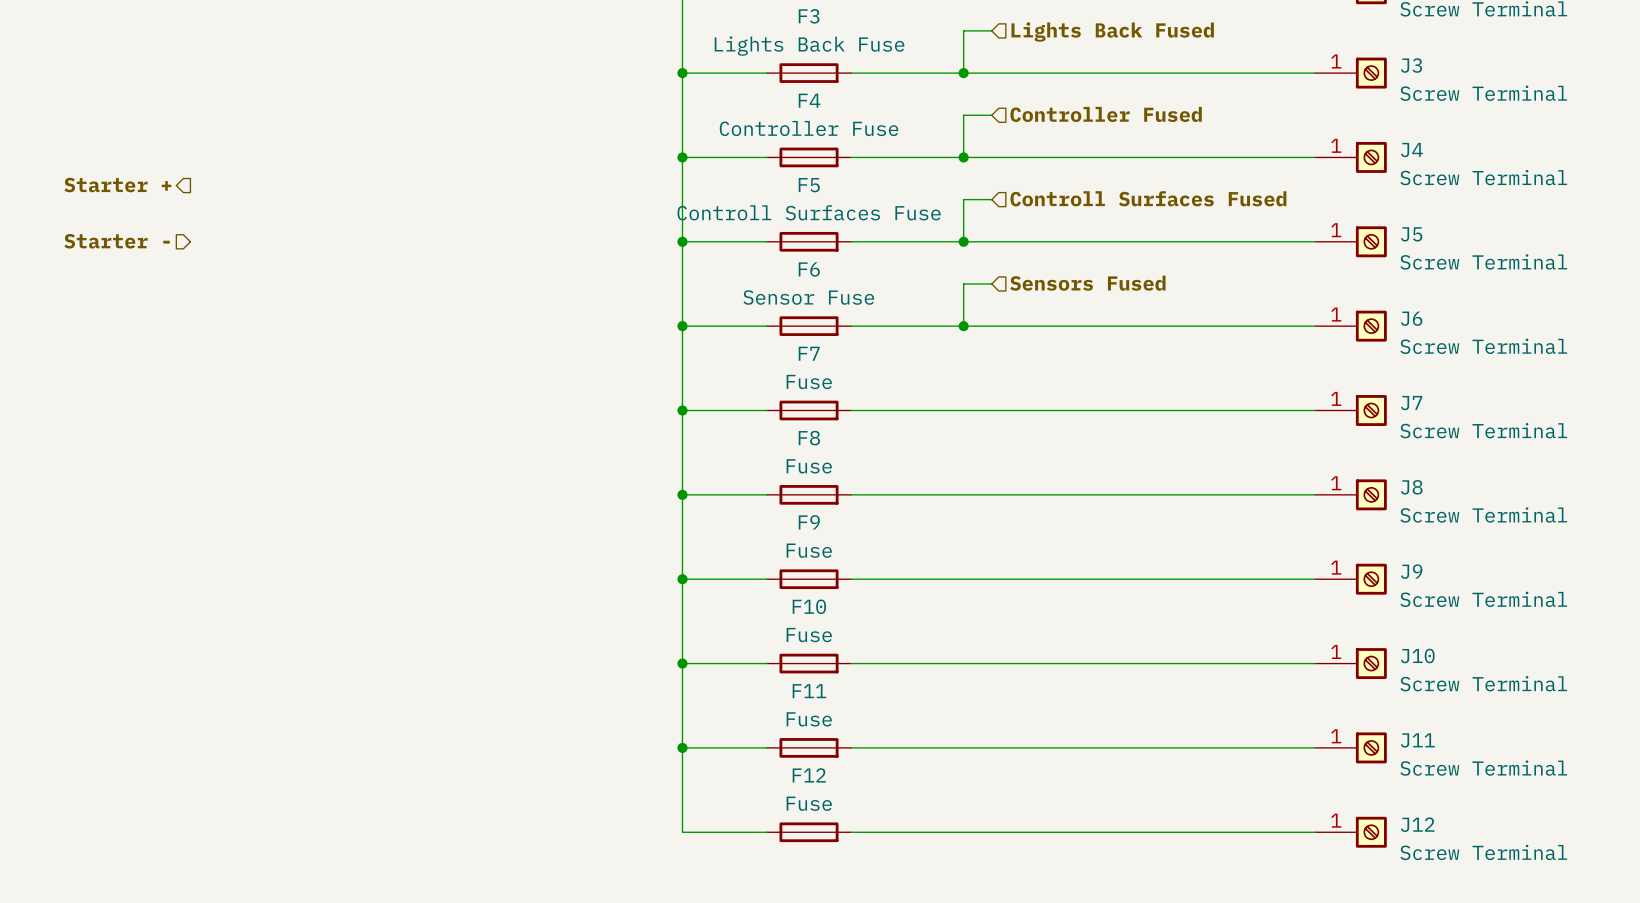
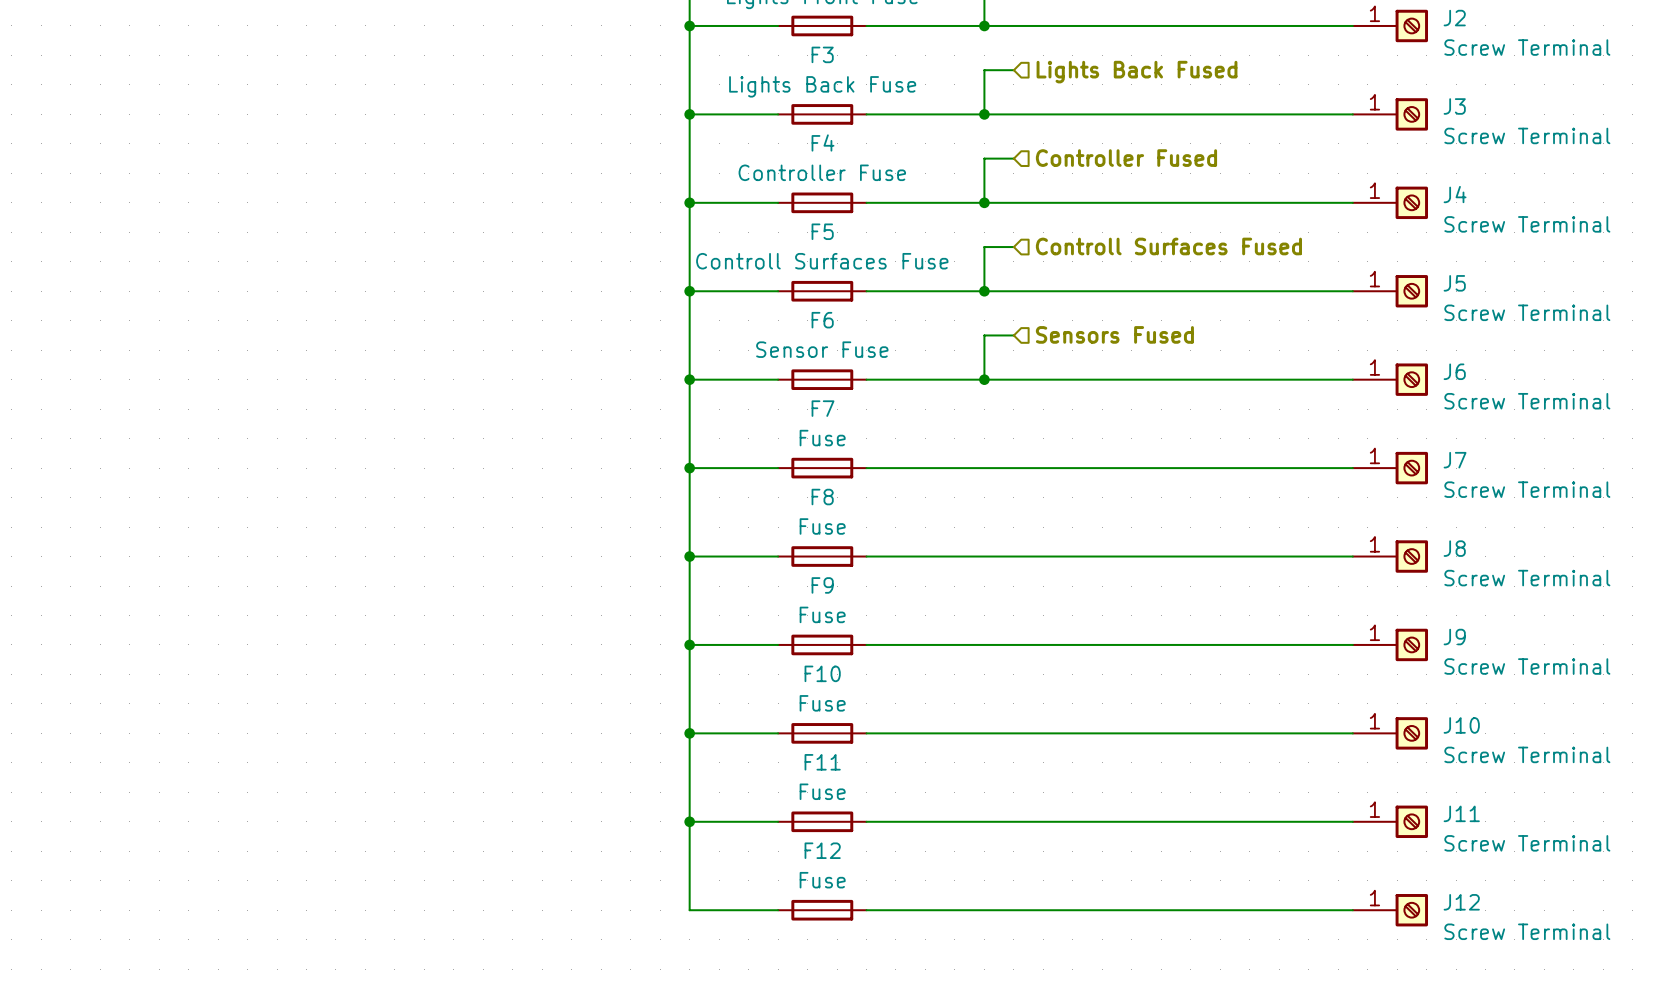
hierarchical label: Starter + (117, 185) -> none
hierarchical label: Starter - (117, 241) -> none

